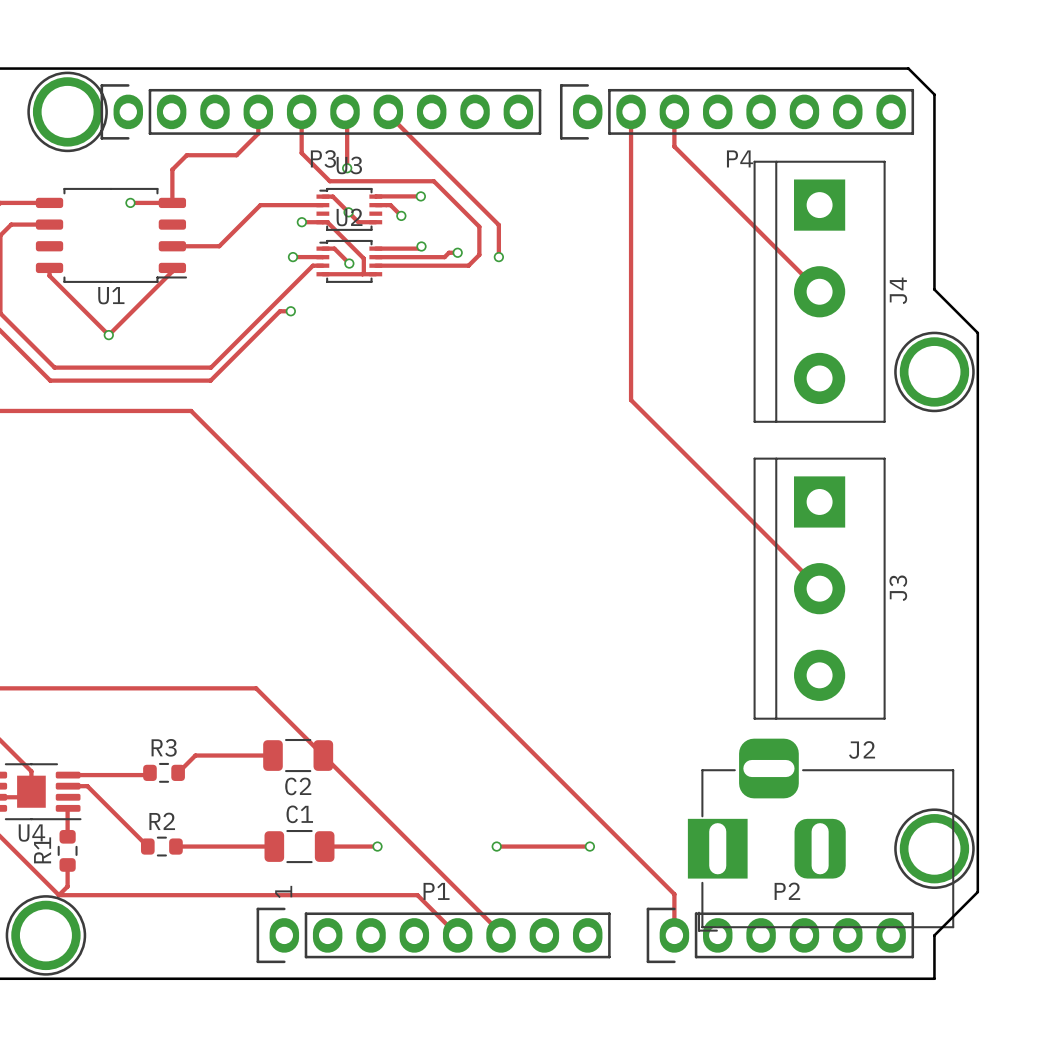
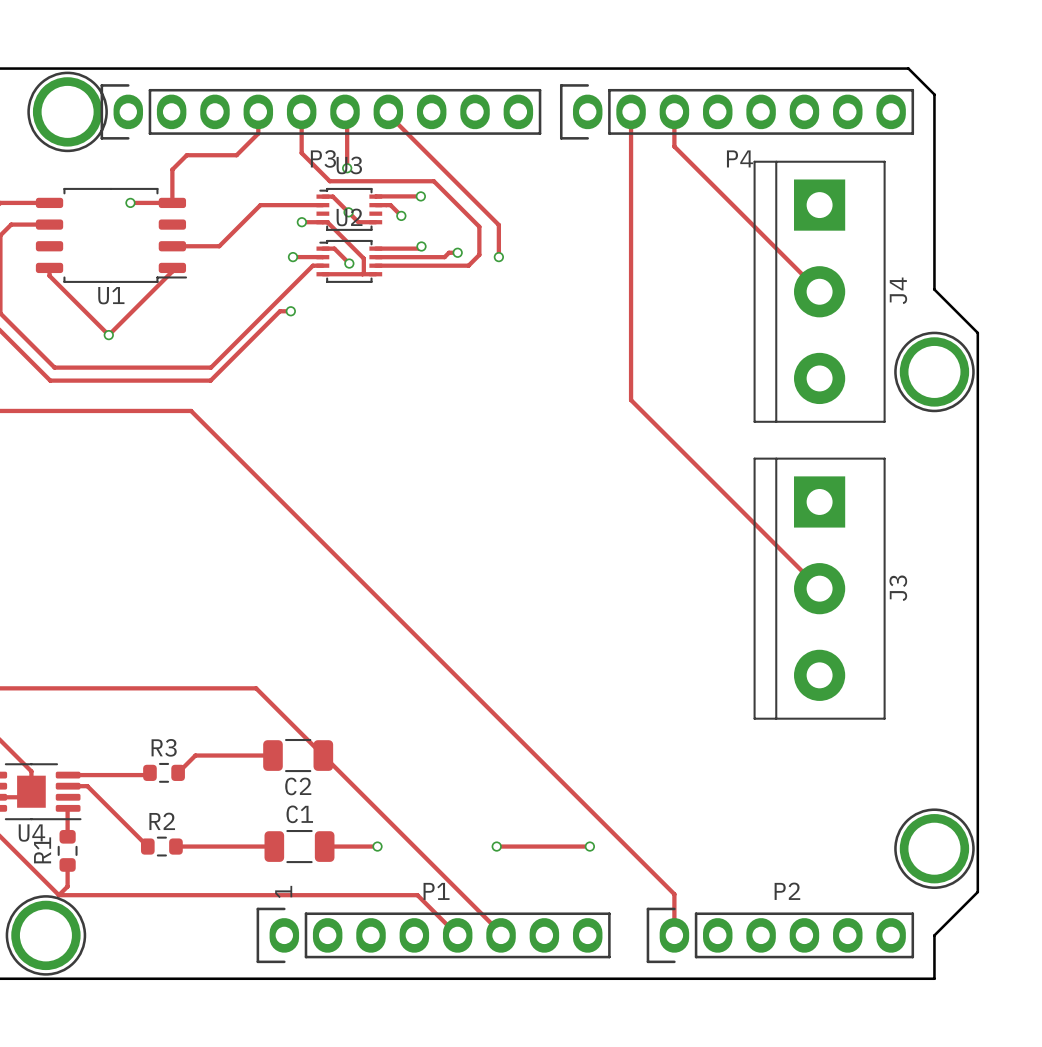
J2: (821, 835) -> none

